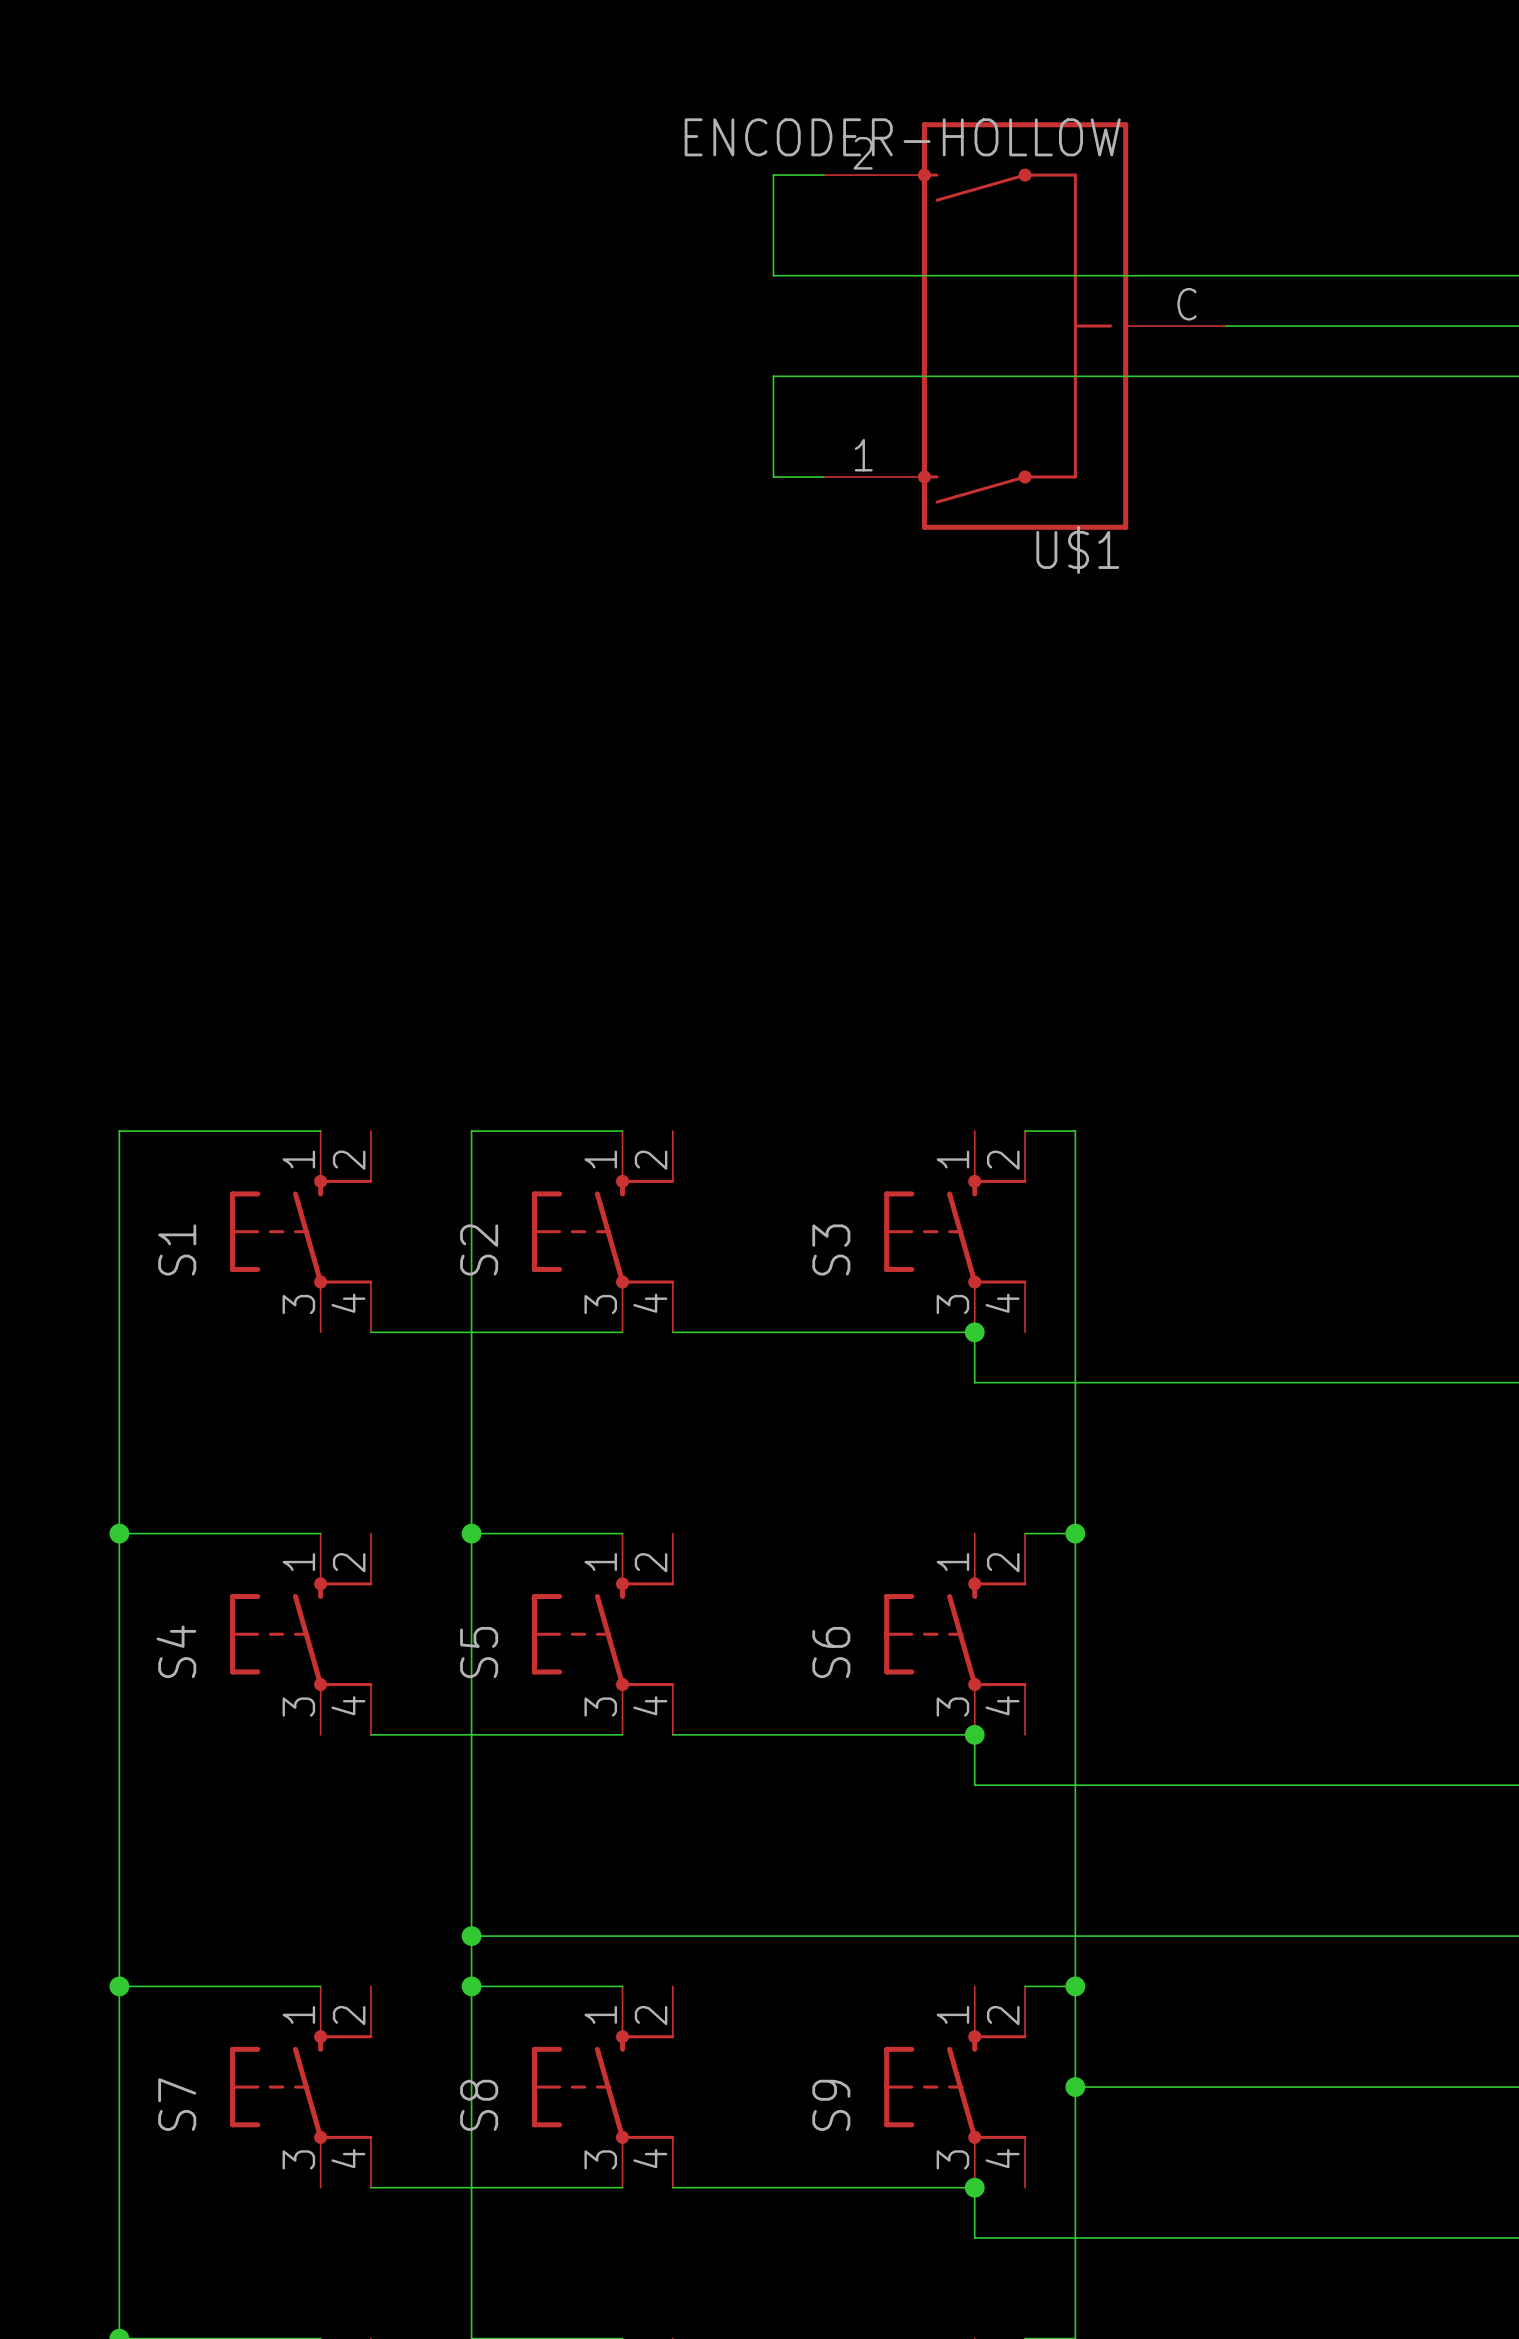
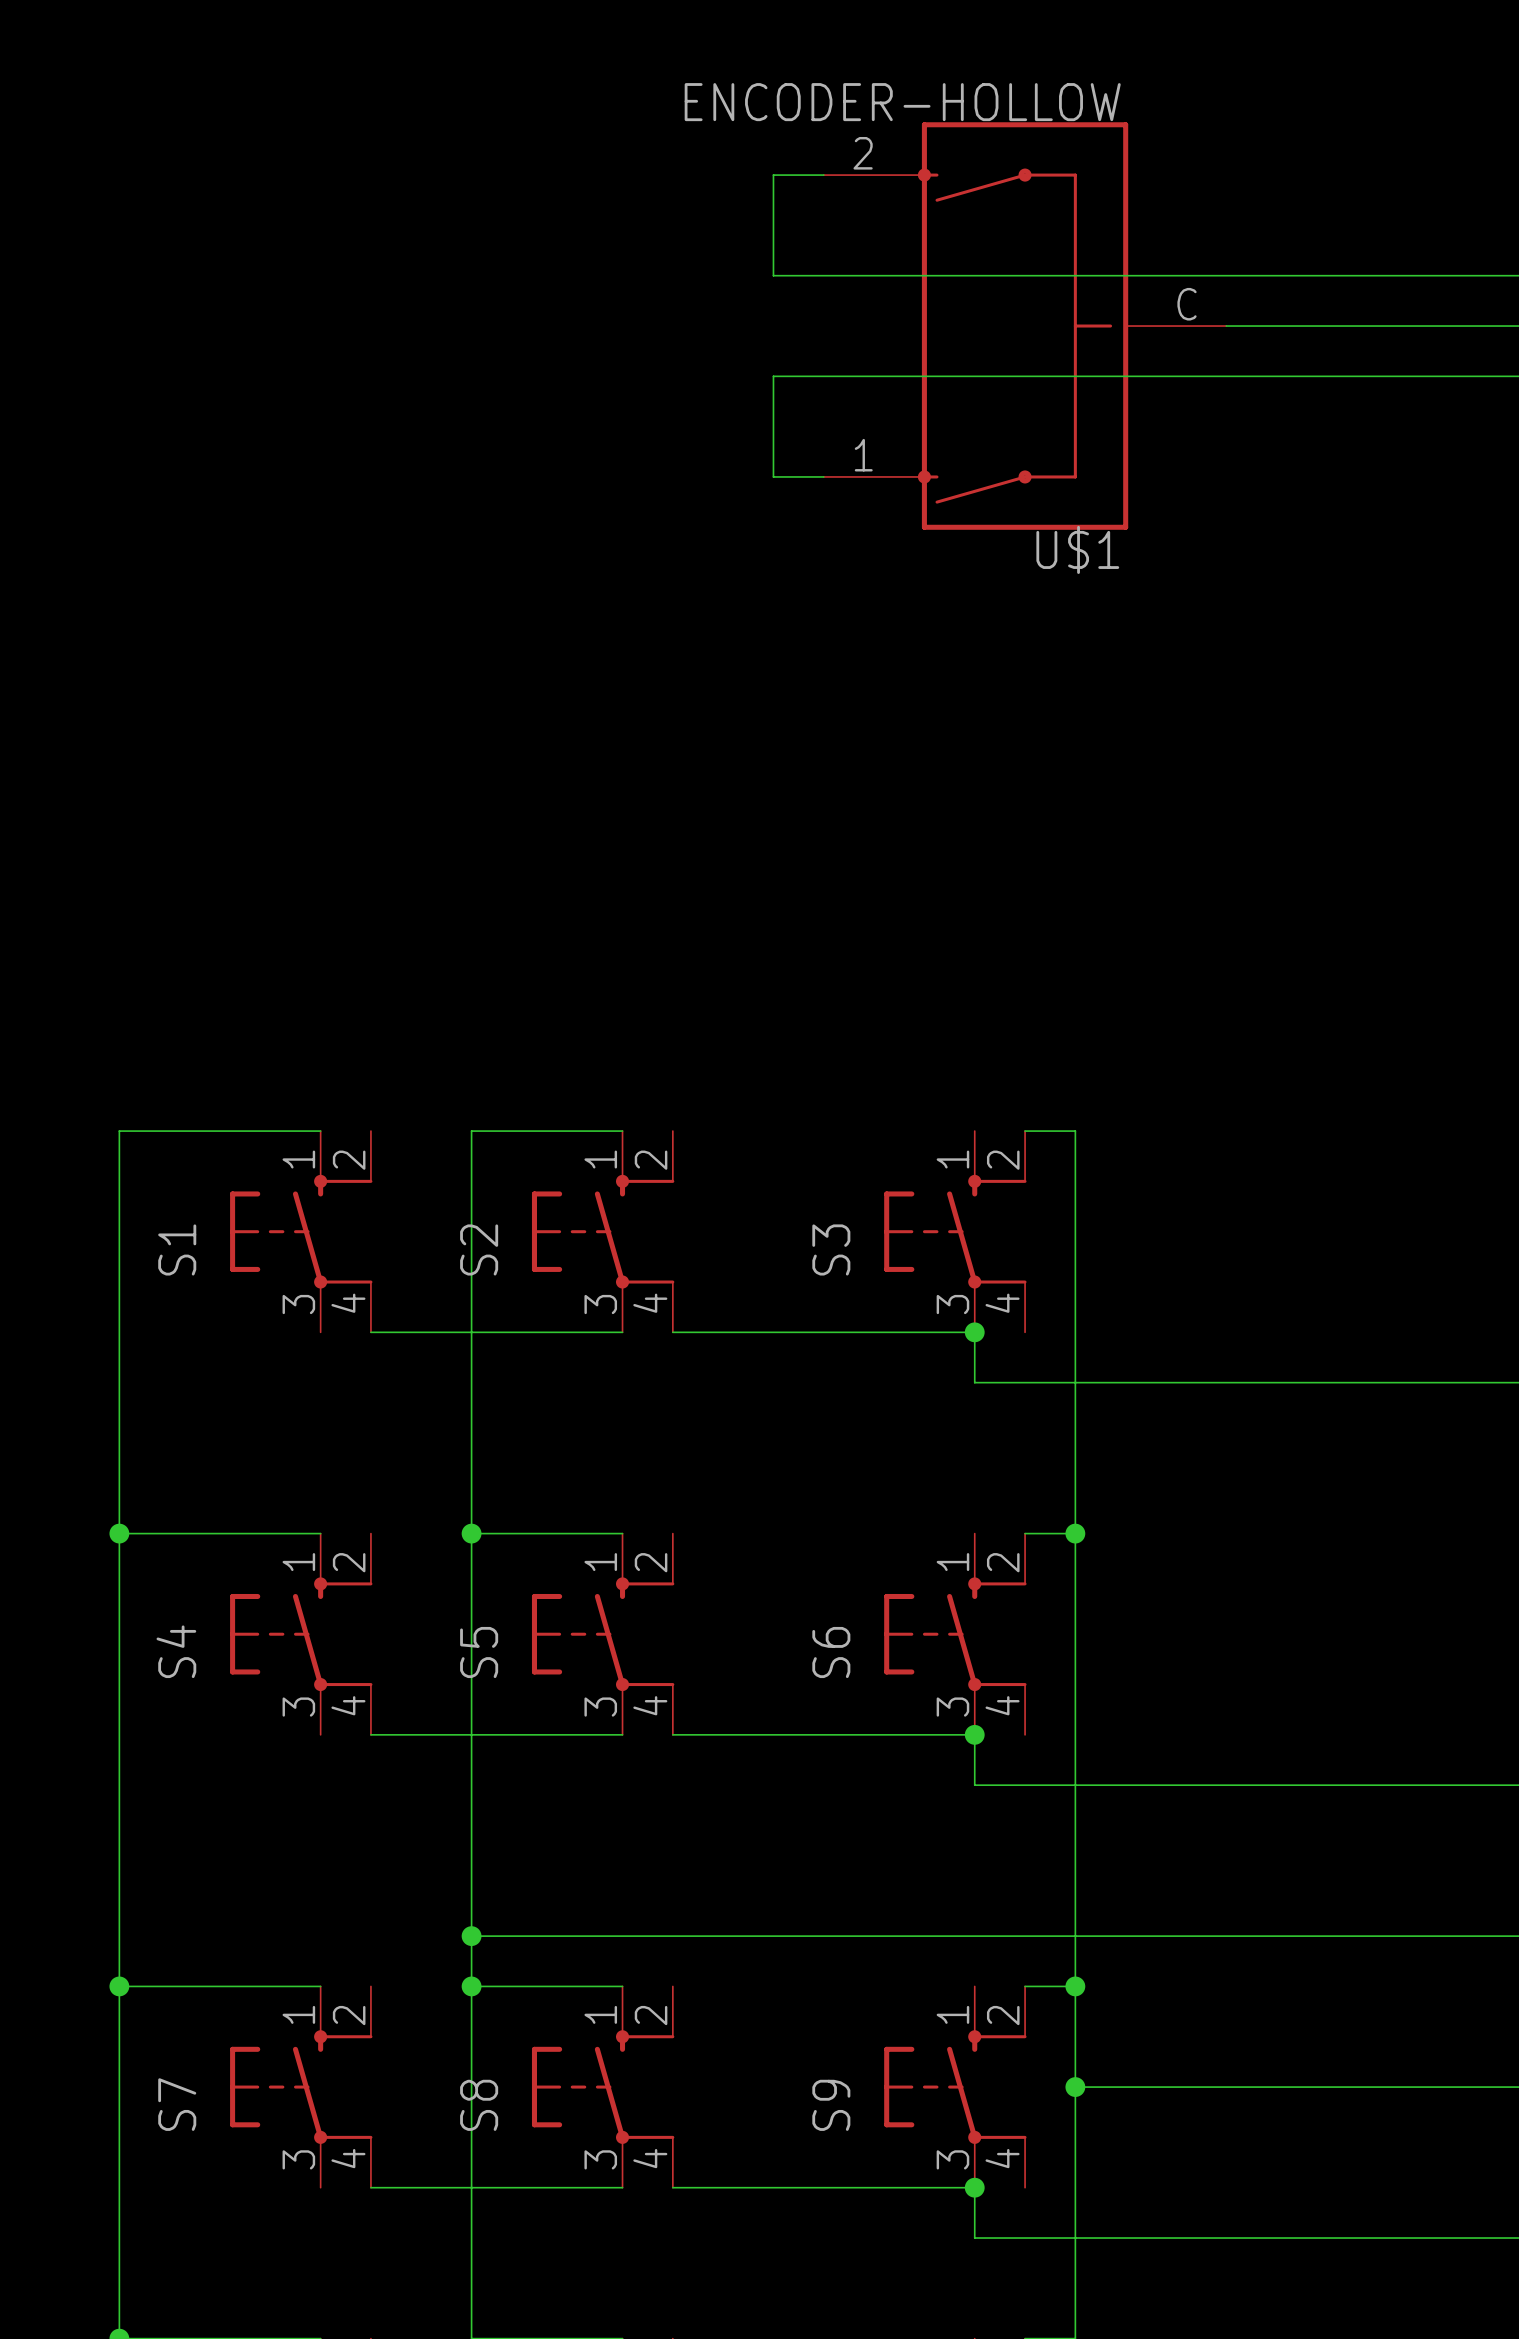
U$1 value position: ENCODER-HOLLOW (902, 137) -> ENCODER-HOLLOW (902, 102)

